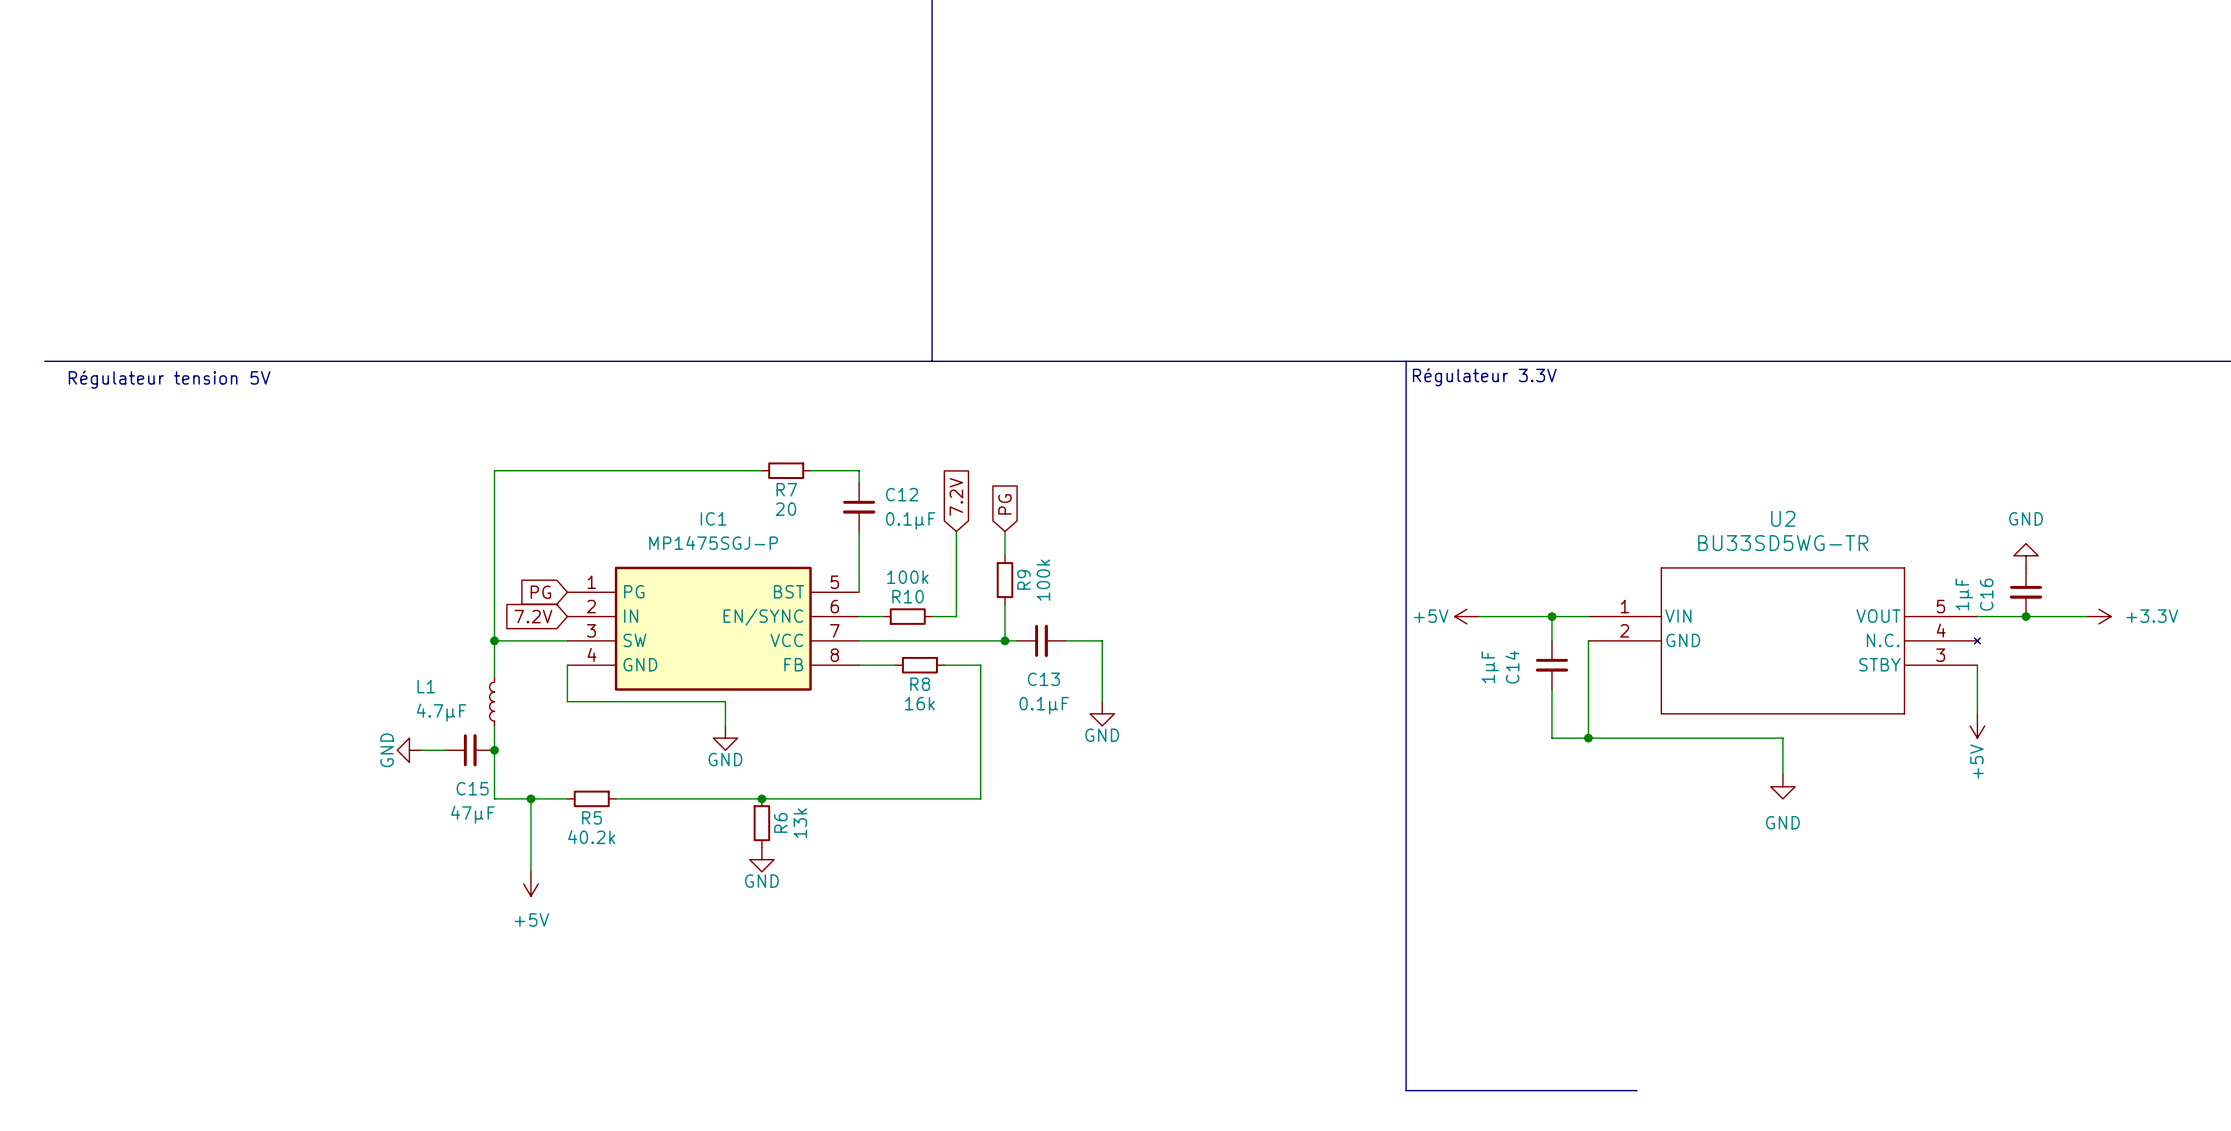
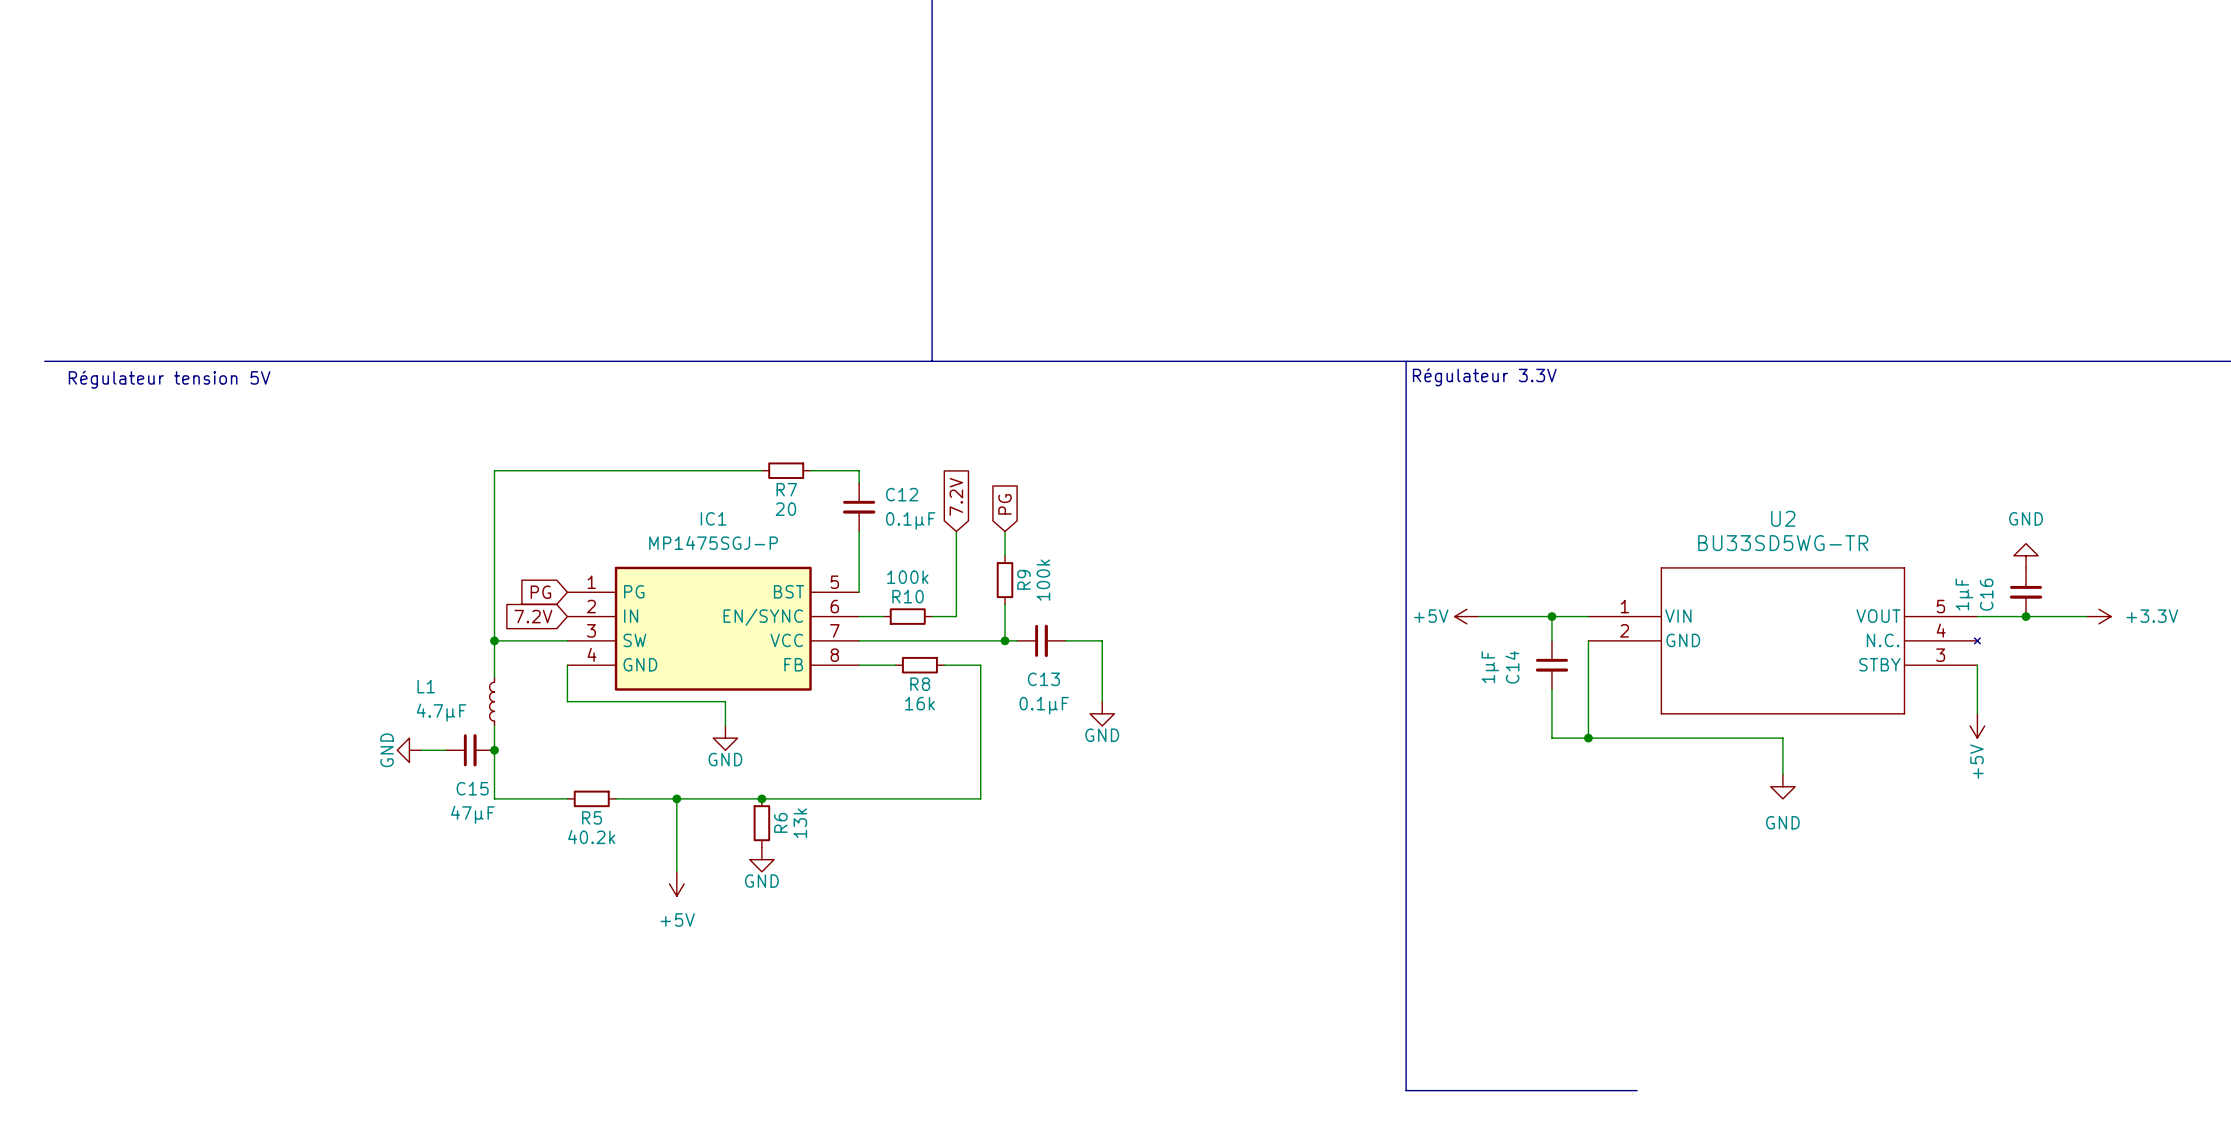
wire: (530, 798) (530, 871) -> (676, 798) (676, 871)
junction: (530, 798) -> none
junction: none -> (676, 798)
power symbol position: +5V (530, 883) -> +5V (676, 883)

